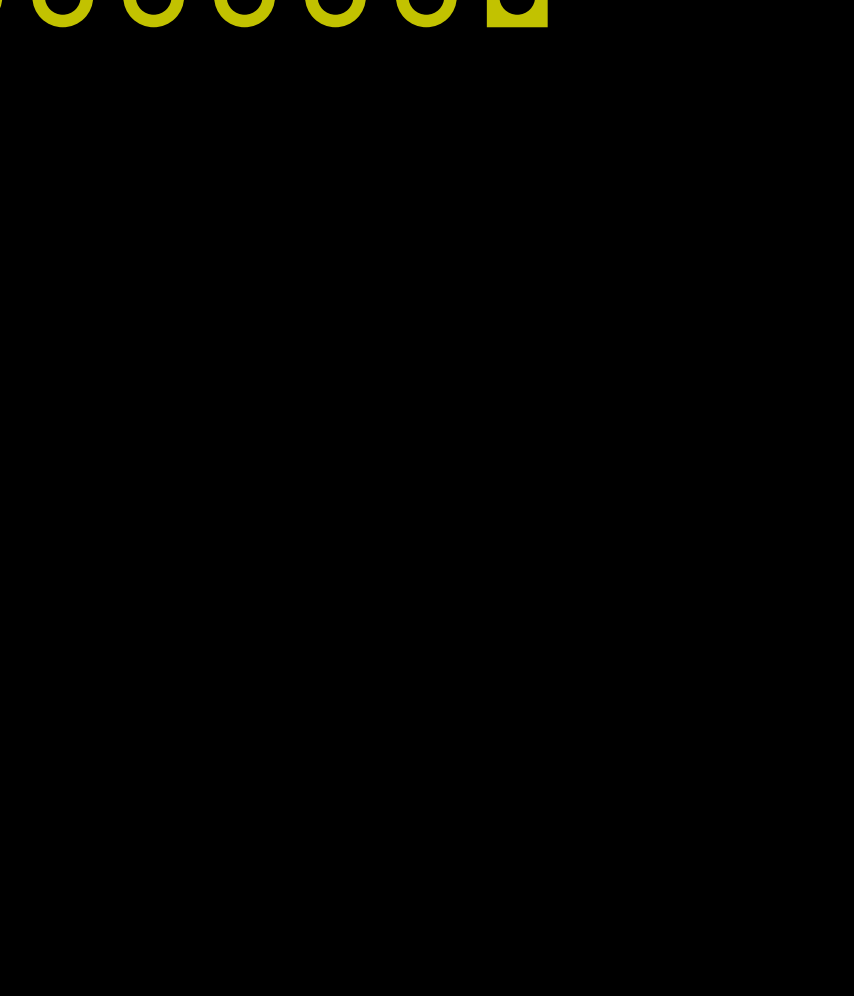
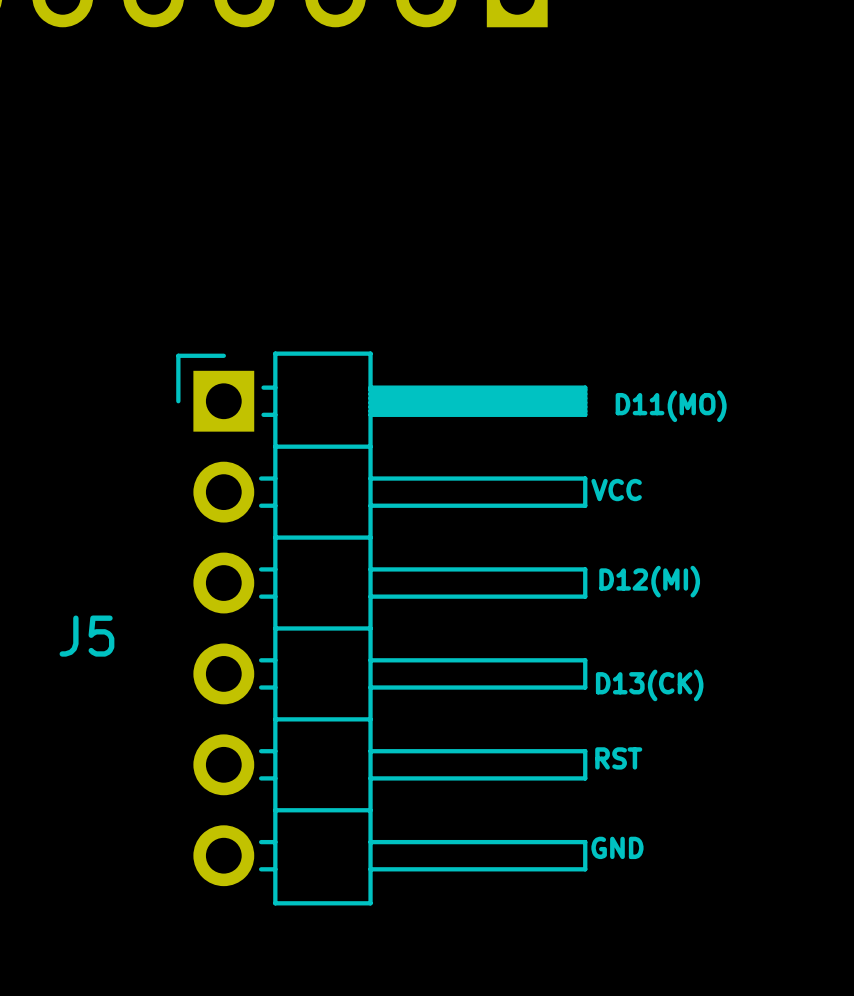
text: none -> D11(MO) (671, 406)
text: none -> VCC (616, 490)
text: none -> D12(MI) (649, 581)
J5: none -> (381, 628)
text: none -> D13(CK) (649, 685)
text: none -> RST (618, 758)
text: none -> GND (617, 847)

